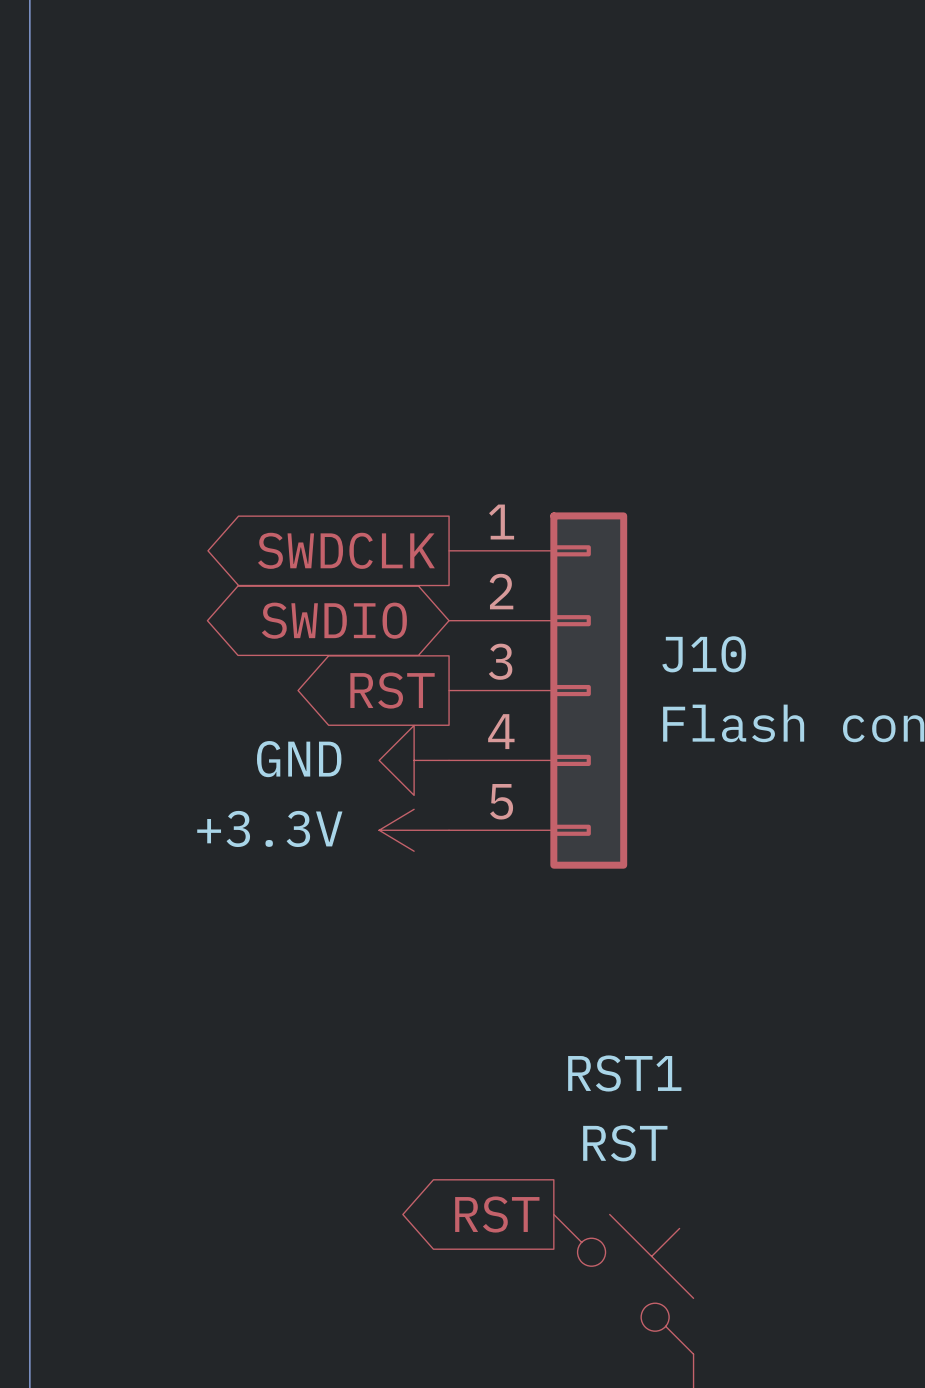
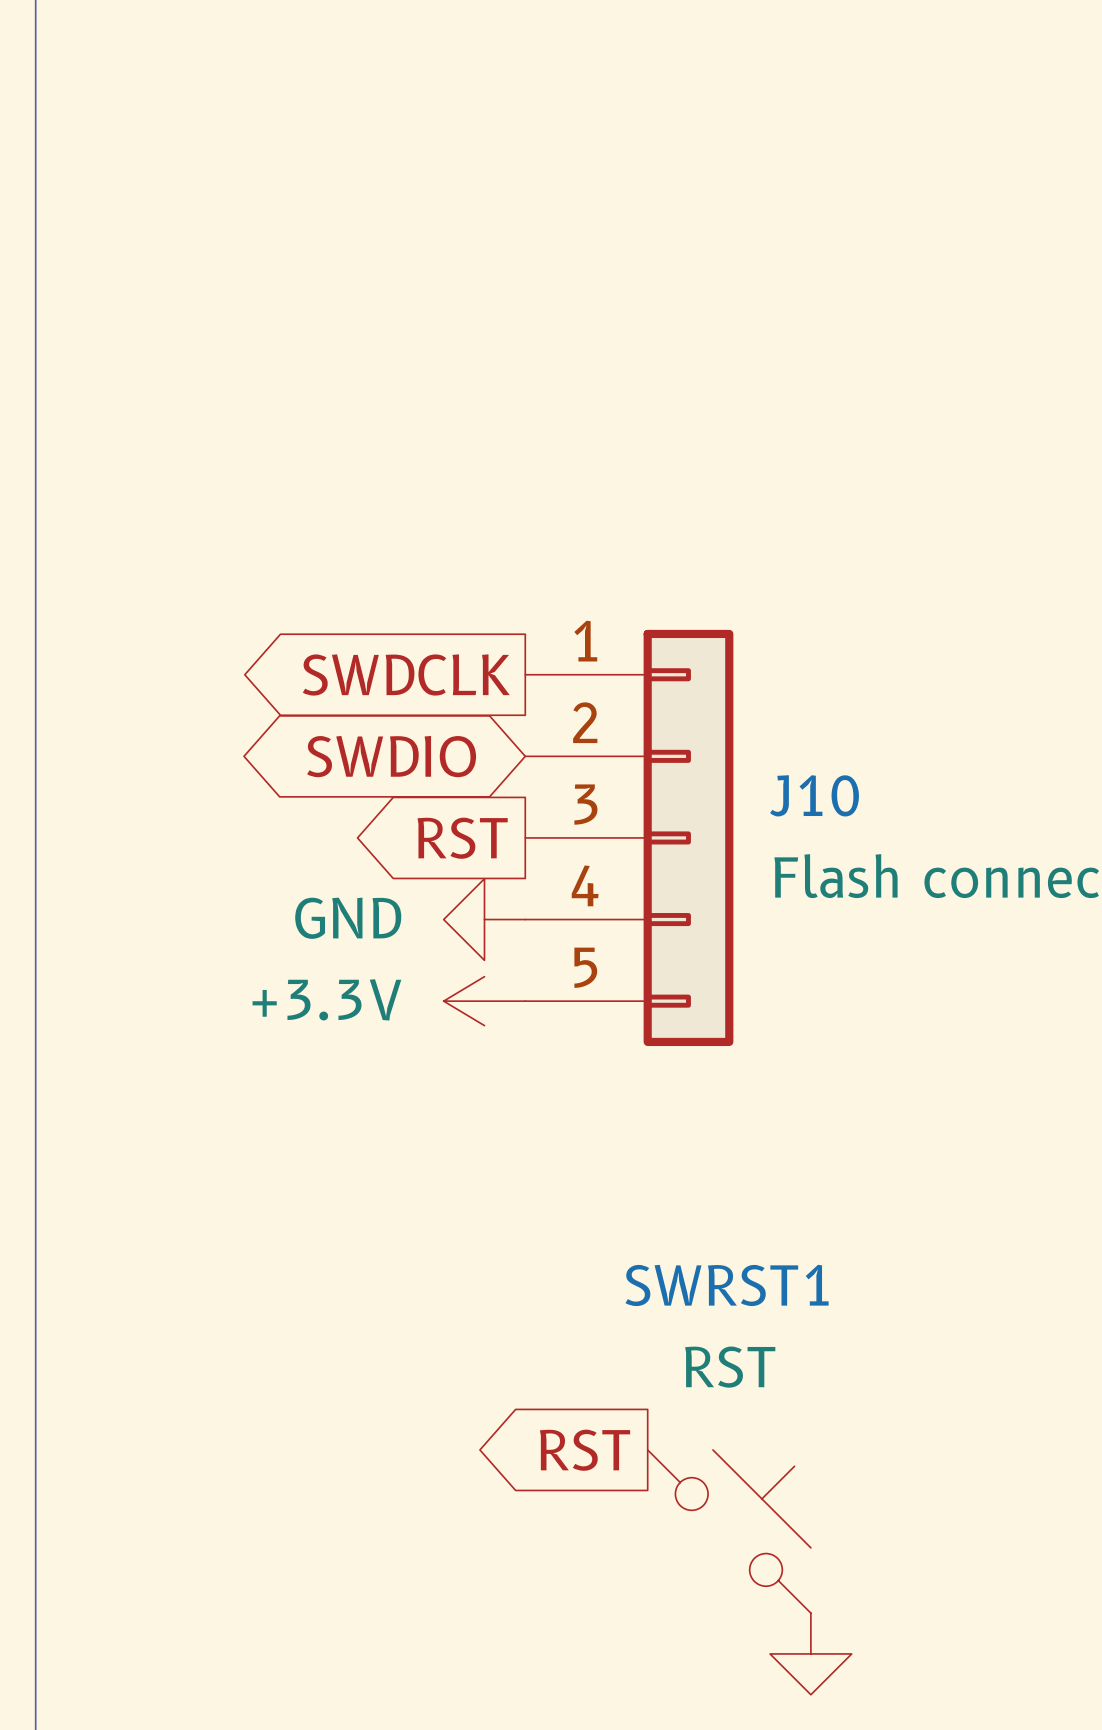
RST1 name: RST1 (624, 1073) -> SWRST1 (727, 1285)

